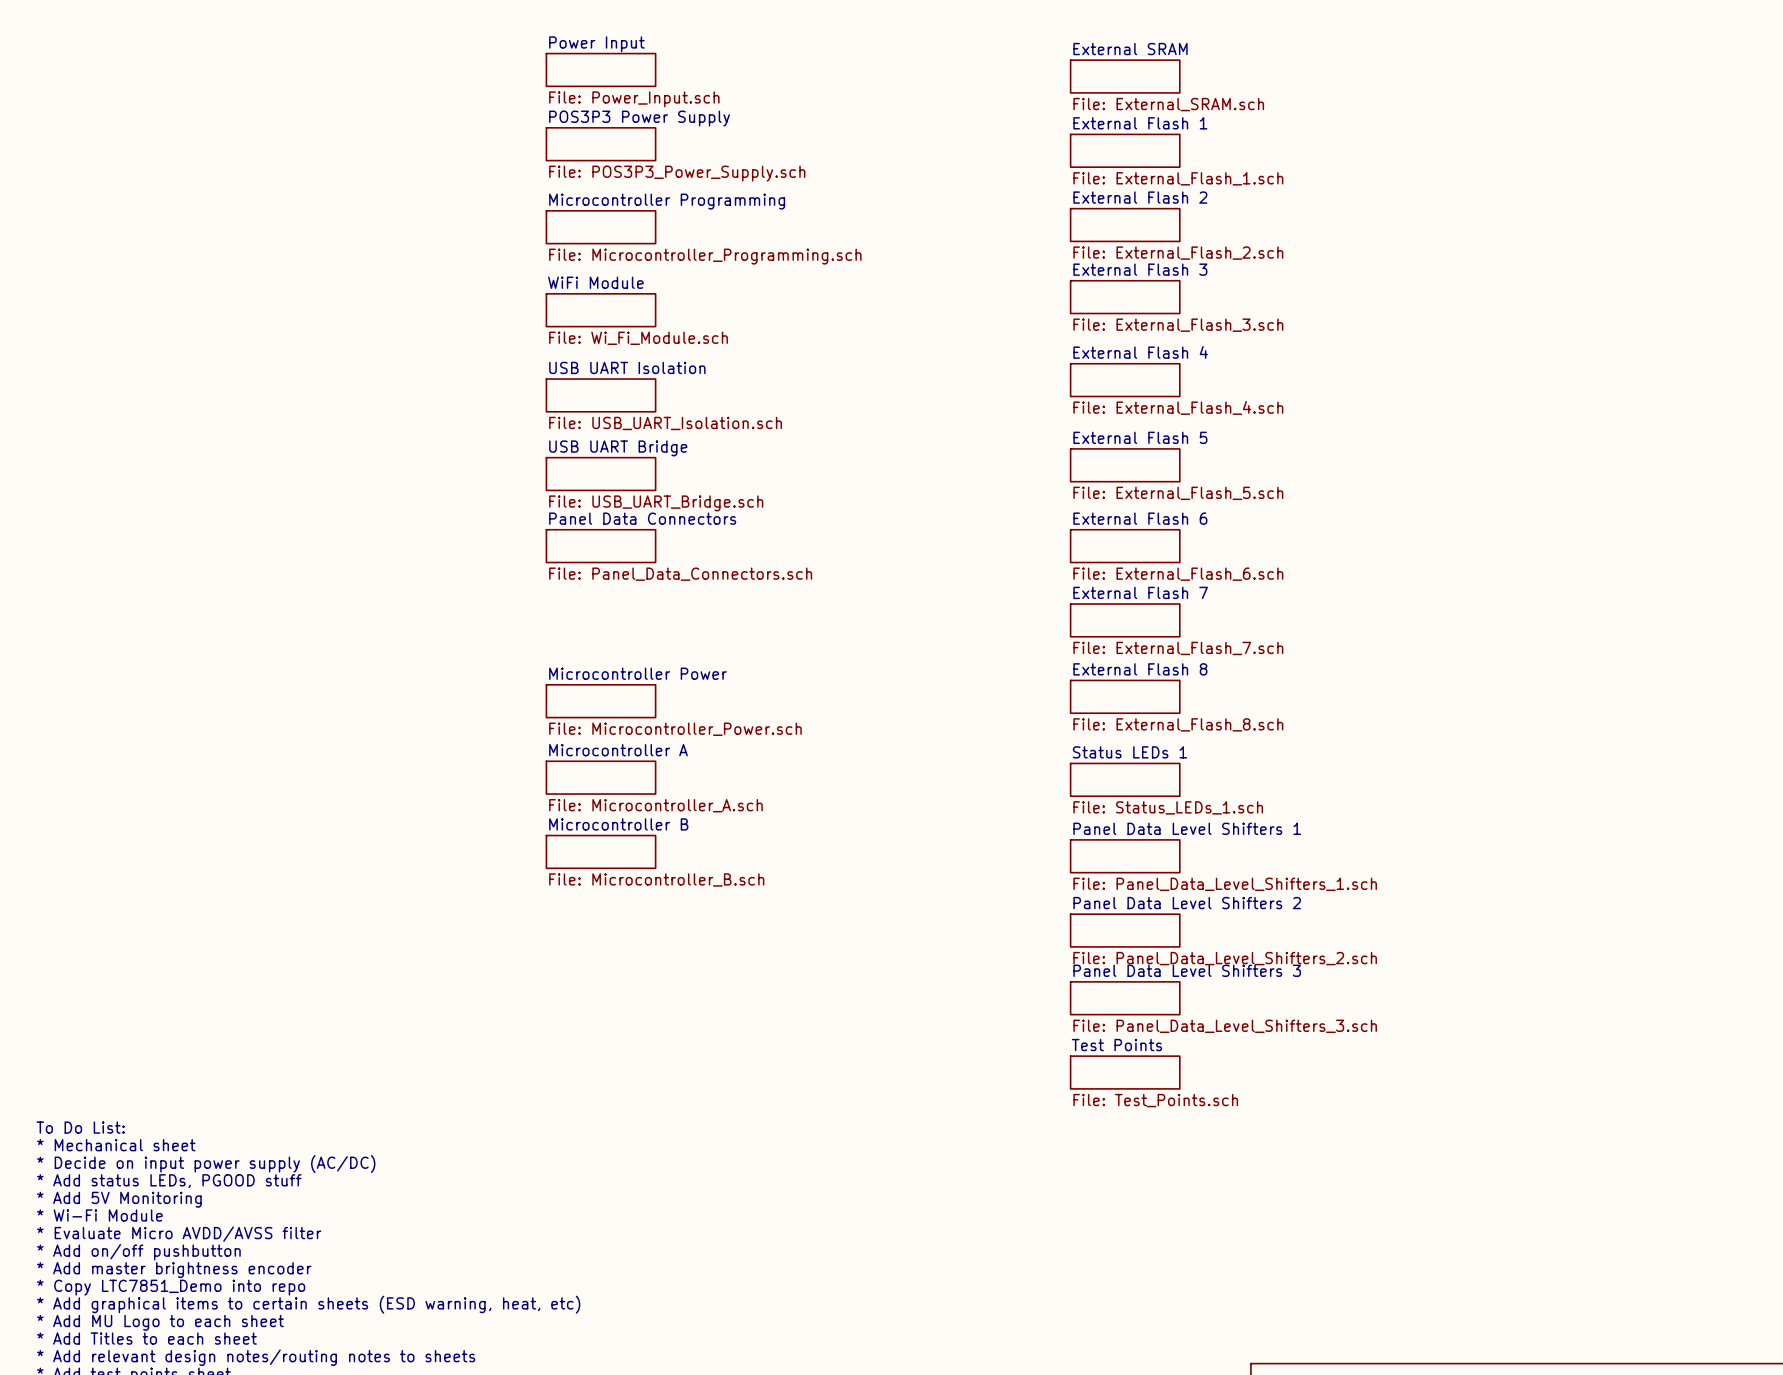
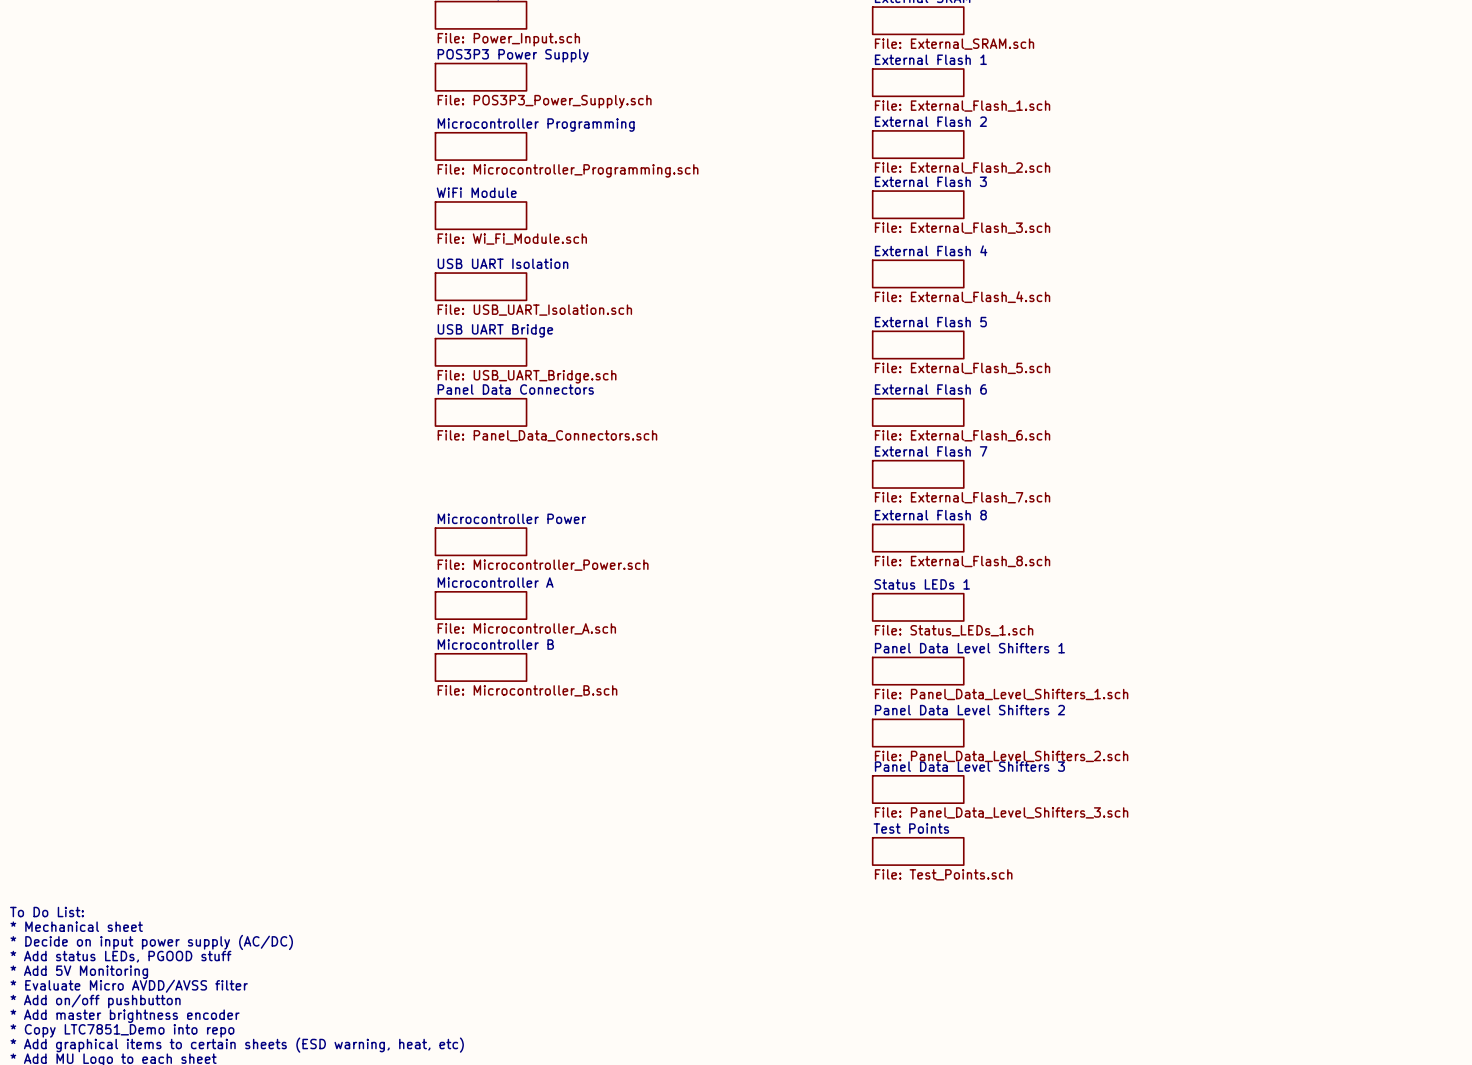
text: To Do List: (80, 1127) -> none
text: * Mechanical sheet (116, 1145) -> To Do List: (46, 912)
text: * Decide on input power supply (AC/DC) (206, 1164) -> * Mechanical sheet (76, 926)
text: * Add status LEDs, PGOOD stuff (169, 1181) -> * Decide on input power supply (AC/DC) (151, 942)
text: * Add 5V Monitoring (119, 1199) -> * Add status LEDs, PGOOD stuff (120, 956)
text: * Wi-Fi Module (99, 1215) -> * Add 5V Monitoring (79, 972)

